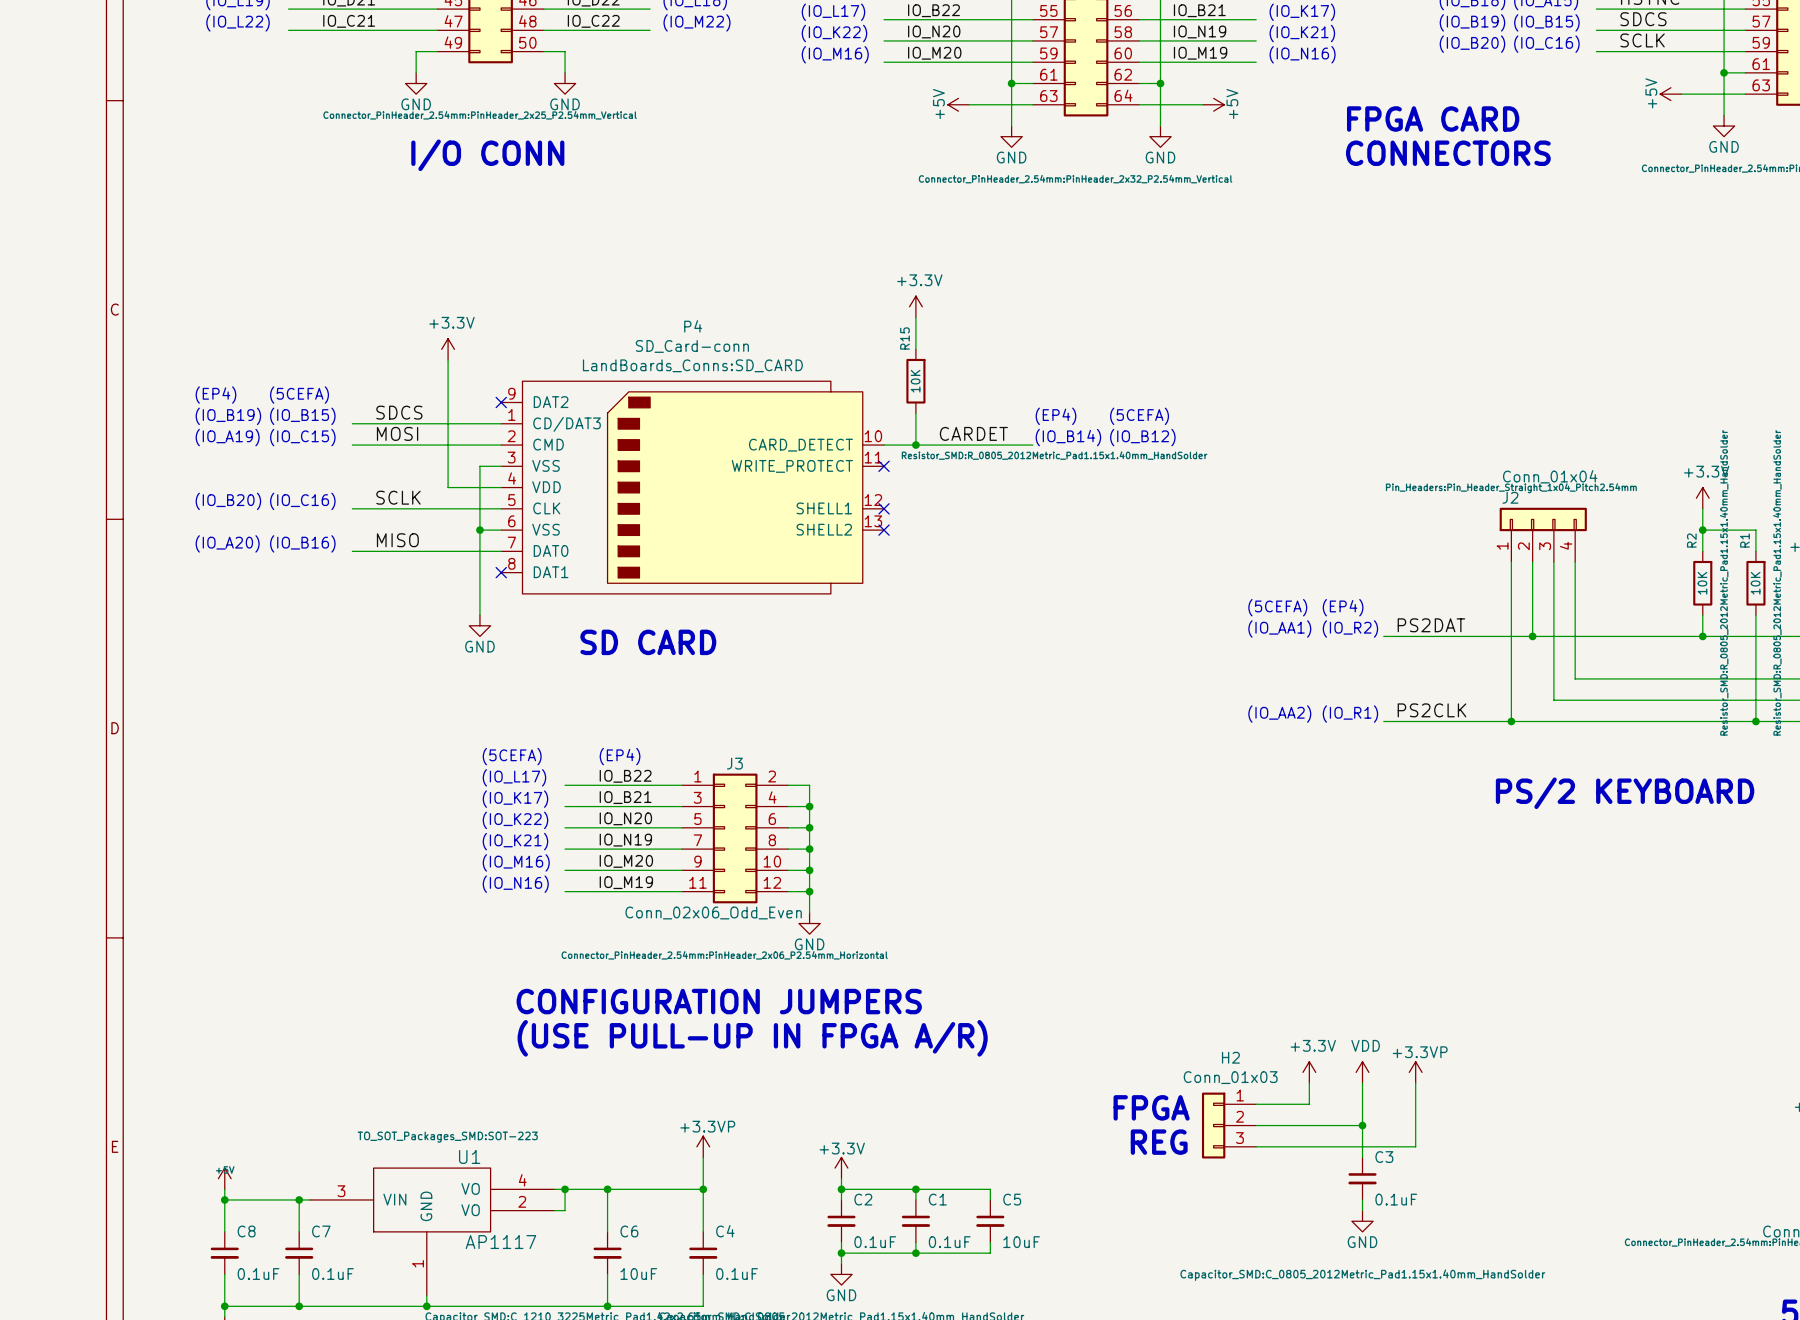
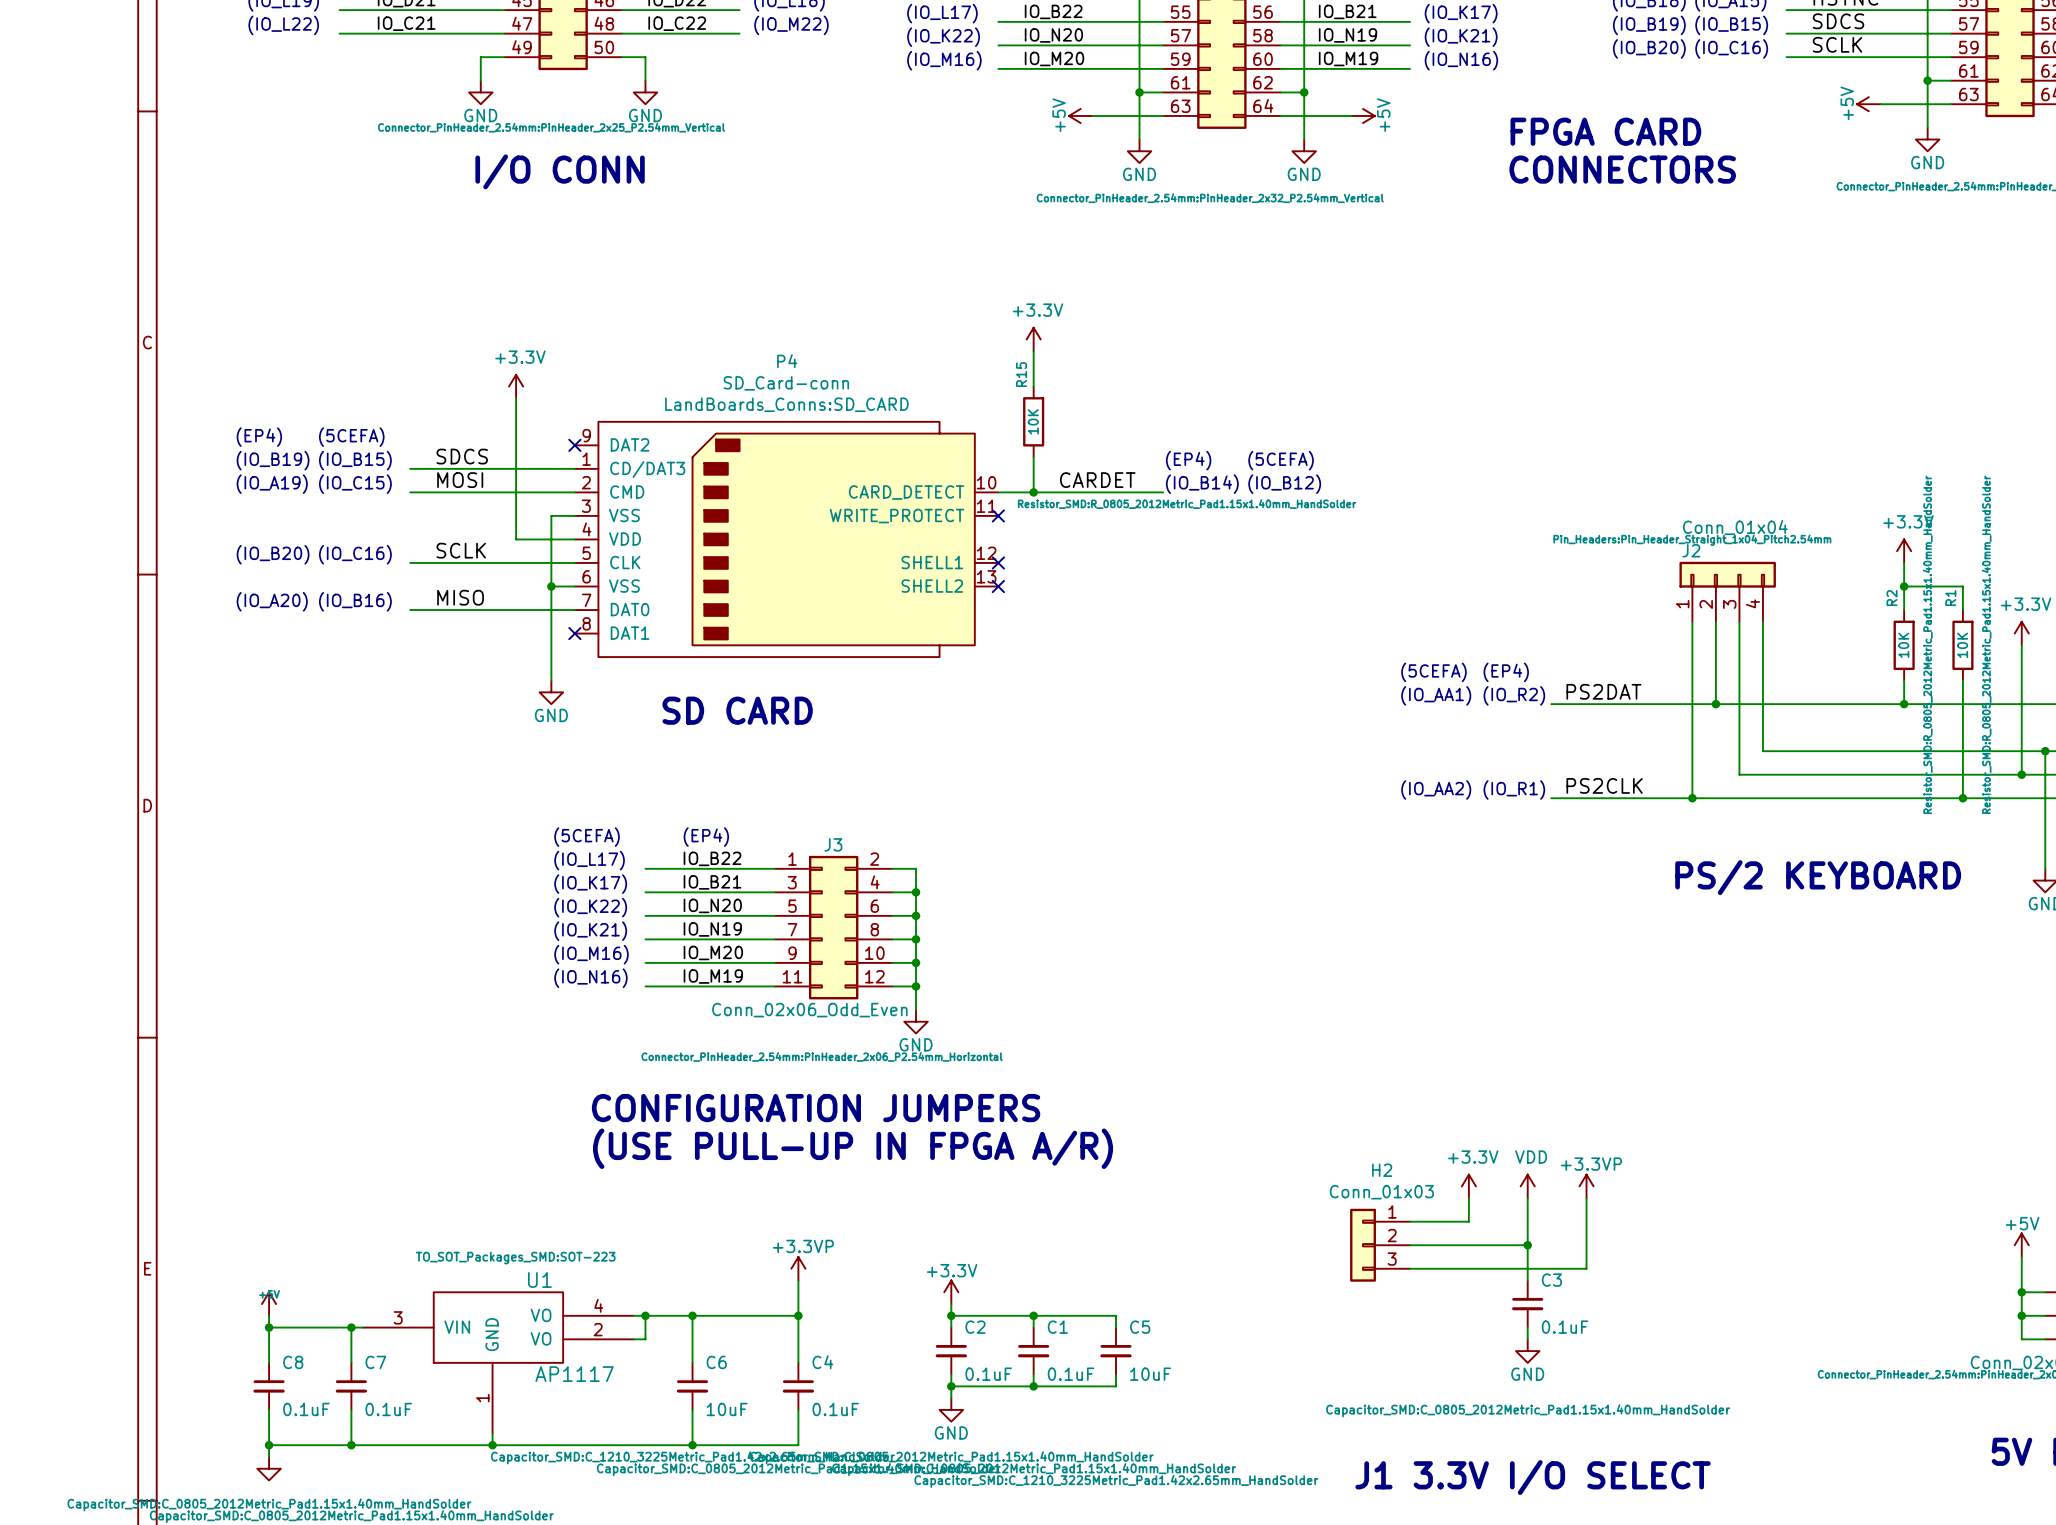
text: FPGA (1151, 1107) -> none
text: REG (1159, 1142) -> none

